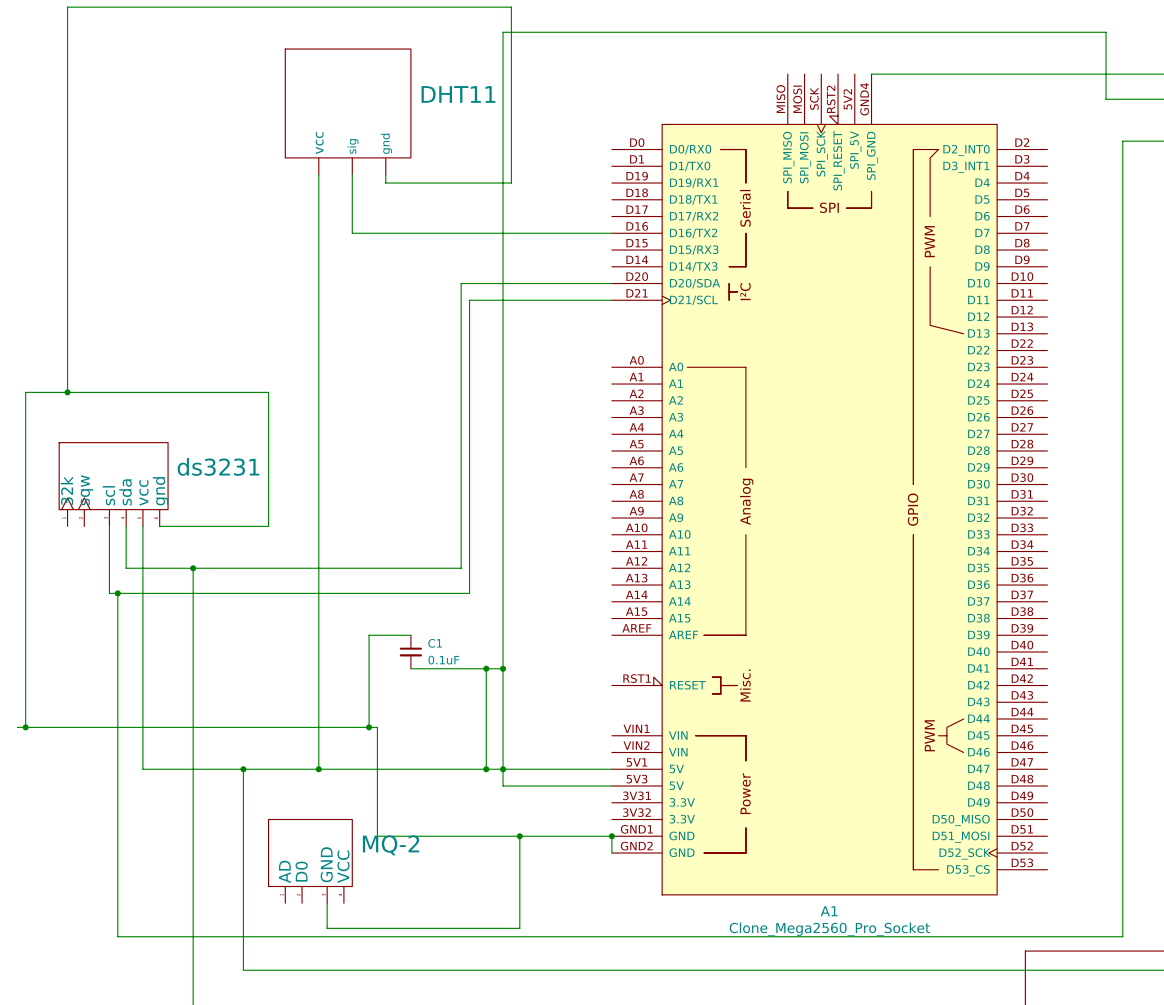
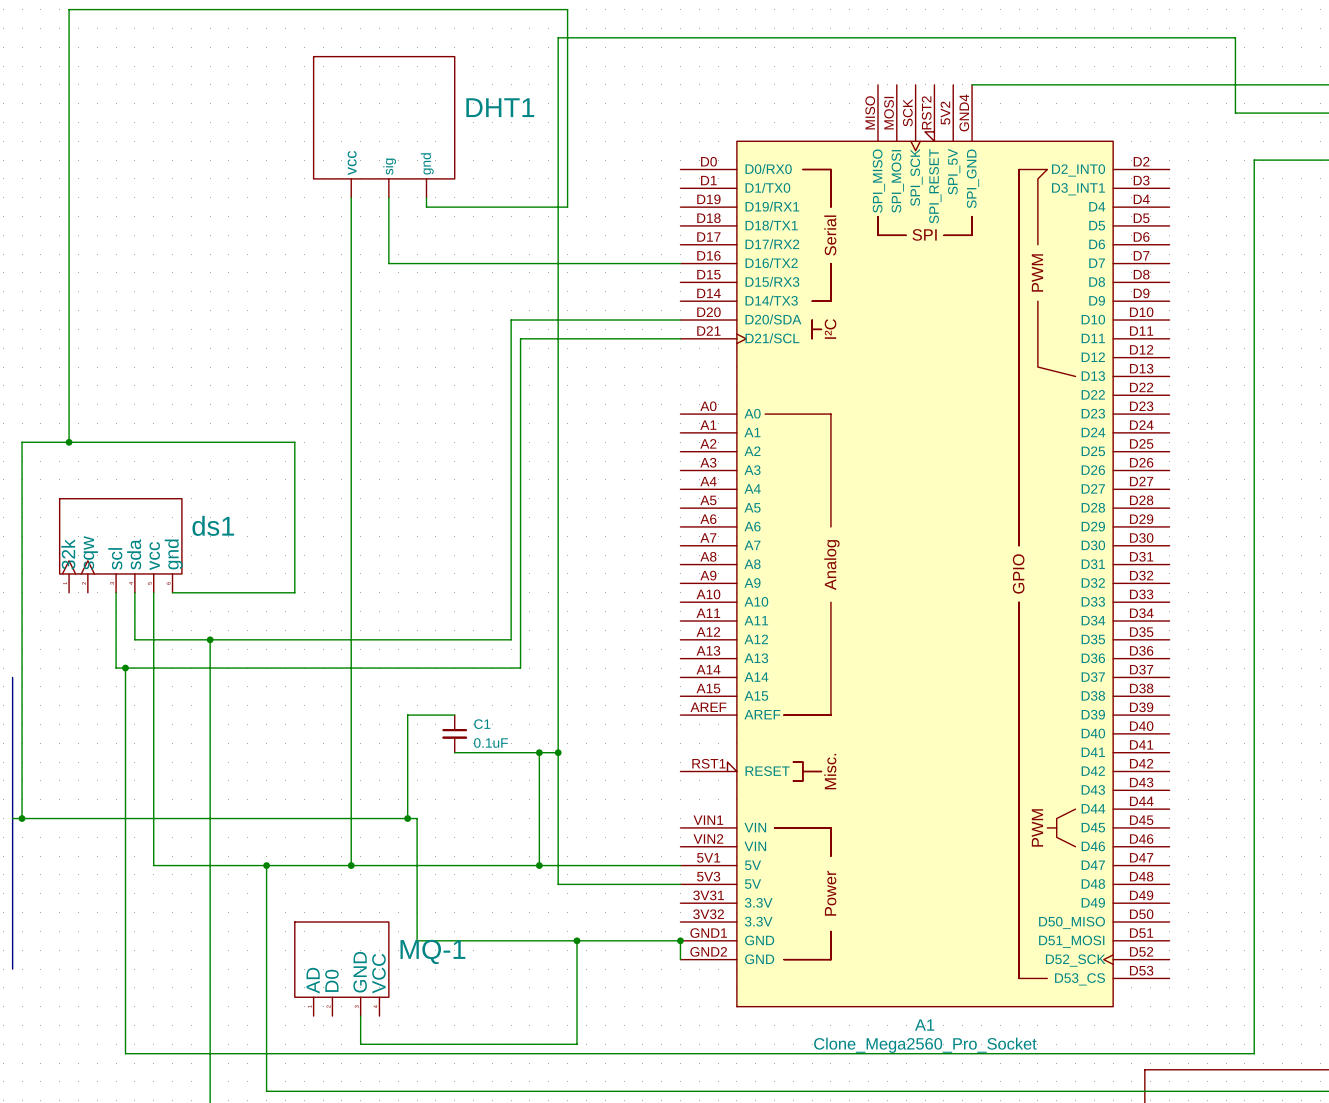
DHT11 name: DHT11 (458, 94) -> DHT1 (500, 107)
ds3231 name: ds3231 (218, 466) -> ds1 (213, 525)
bus: none -> (12, 677) (12, 969)
junction: (503, 769) -> none
MQ-2 name: MQ-2 (391, 845) -> MQ-1 (432, 951)

